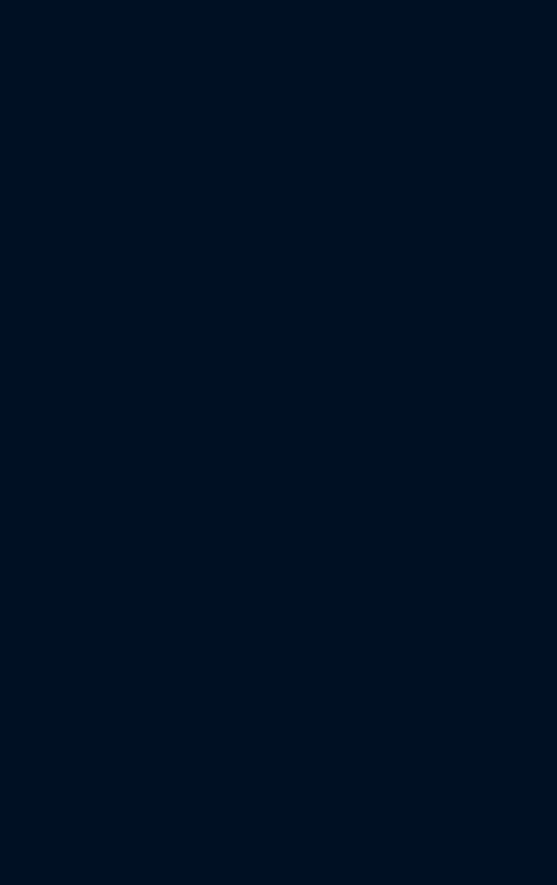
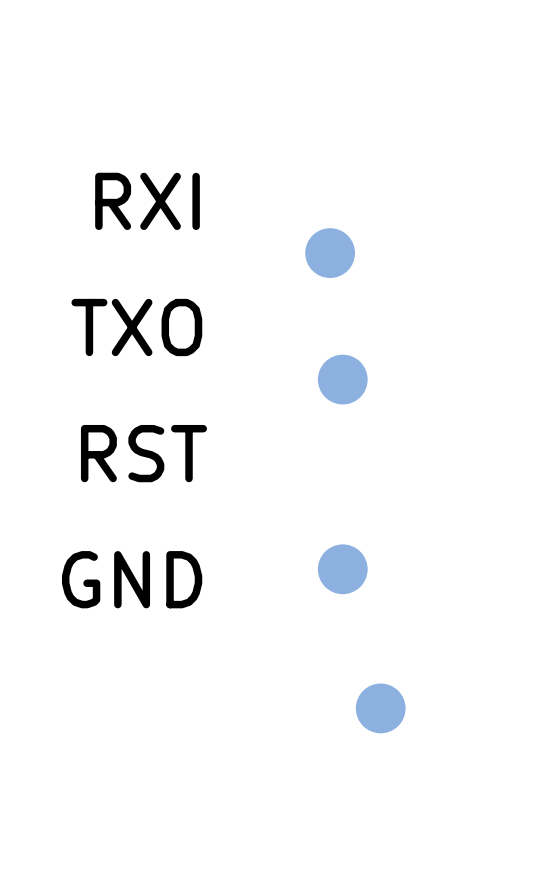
text: none -> RXI (147, 201)
part: none -> (330, 253)
text: none -> TXO (136, 327)
part: none -> (342, 379)
text: none -> RST (143, 453)
part: none -> (342, 569)
text: none -> GND (132, 579)
part: none -> (380, 708)

